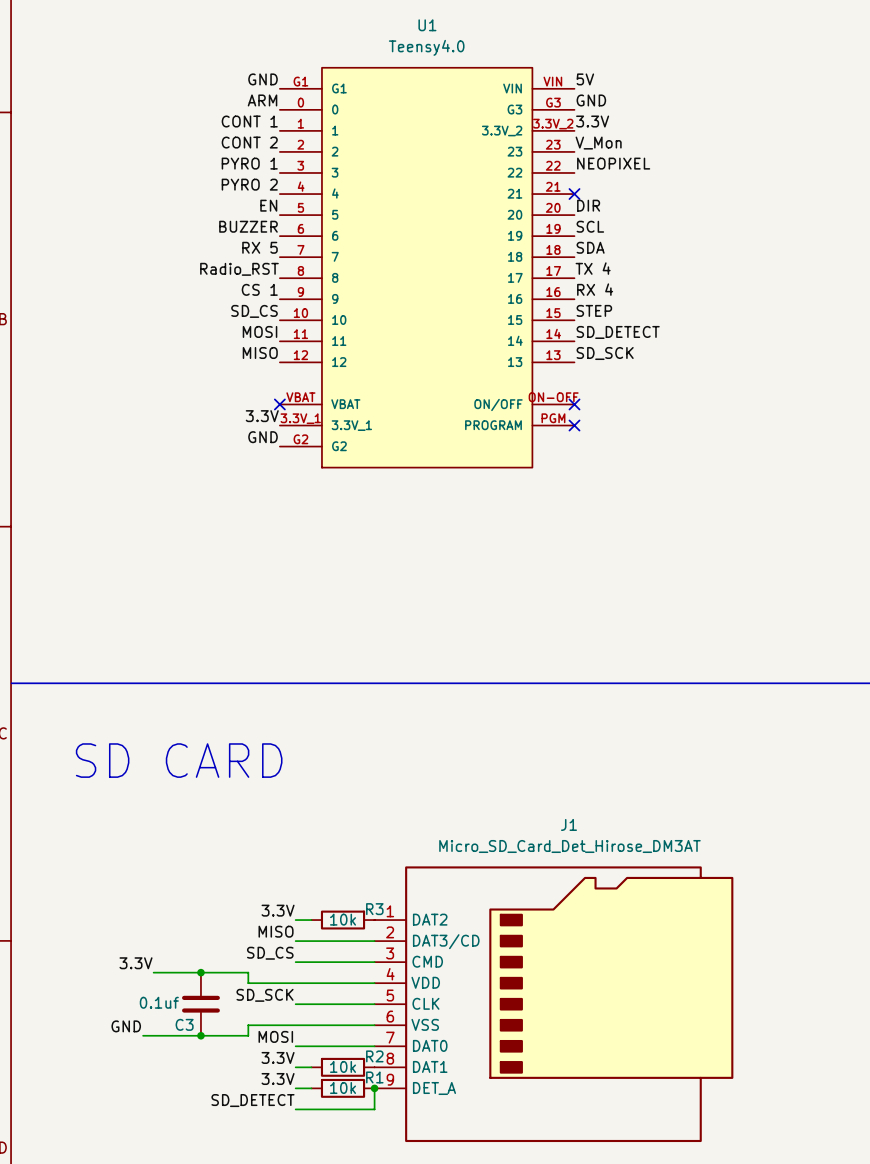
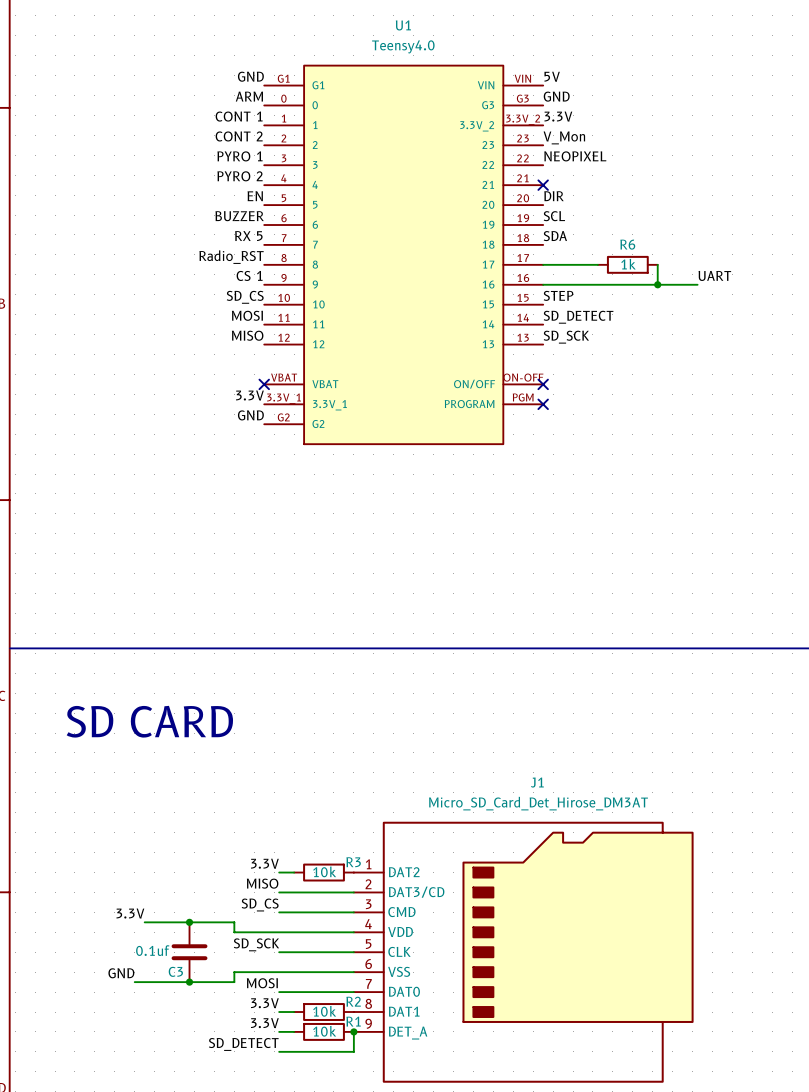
label: TX 4 (593, 268) -> none
wire: none -> (543, 264) (597, 264)
R6: none -> 1k (627, 264)
wire: none -> (657, 264) (657, 284)
label: RX 4 (595, 289) -> none
label: none -> UART (714, 275)
wire: none -> (543, 284) (697, 284)
junction: none -> (657, 284)

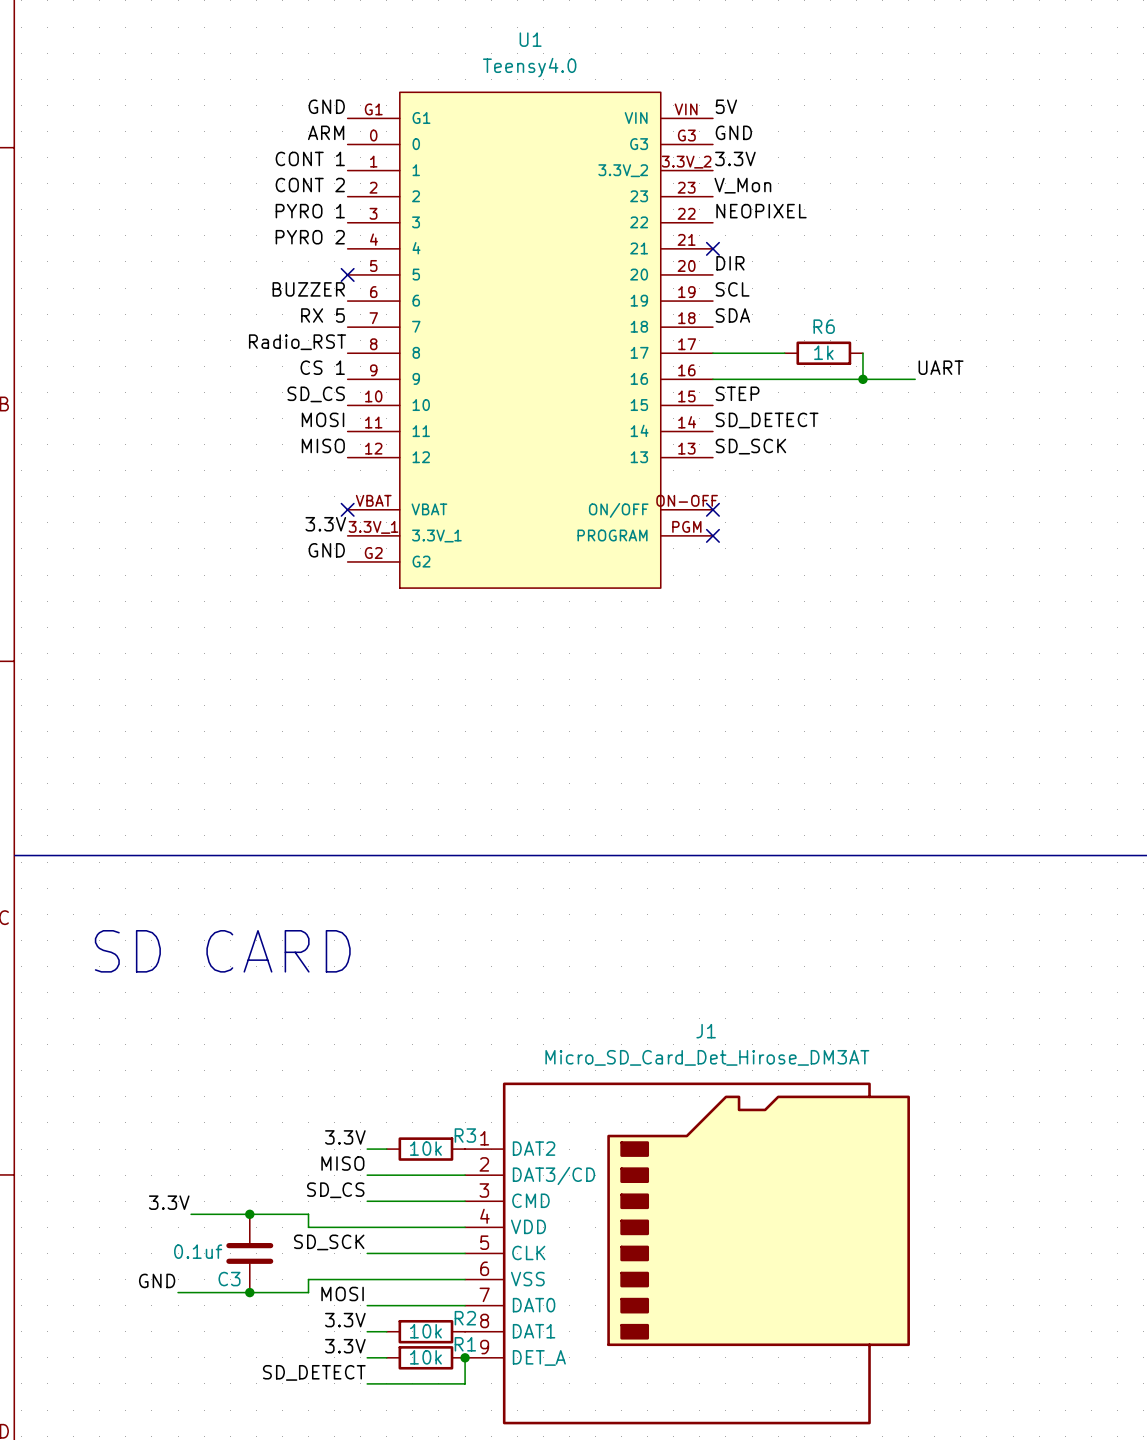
label: EN (255, 196) -> none
no-connect mark: none -> (347, 274)

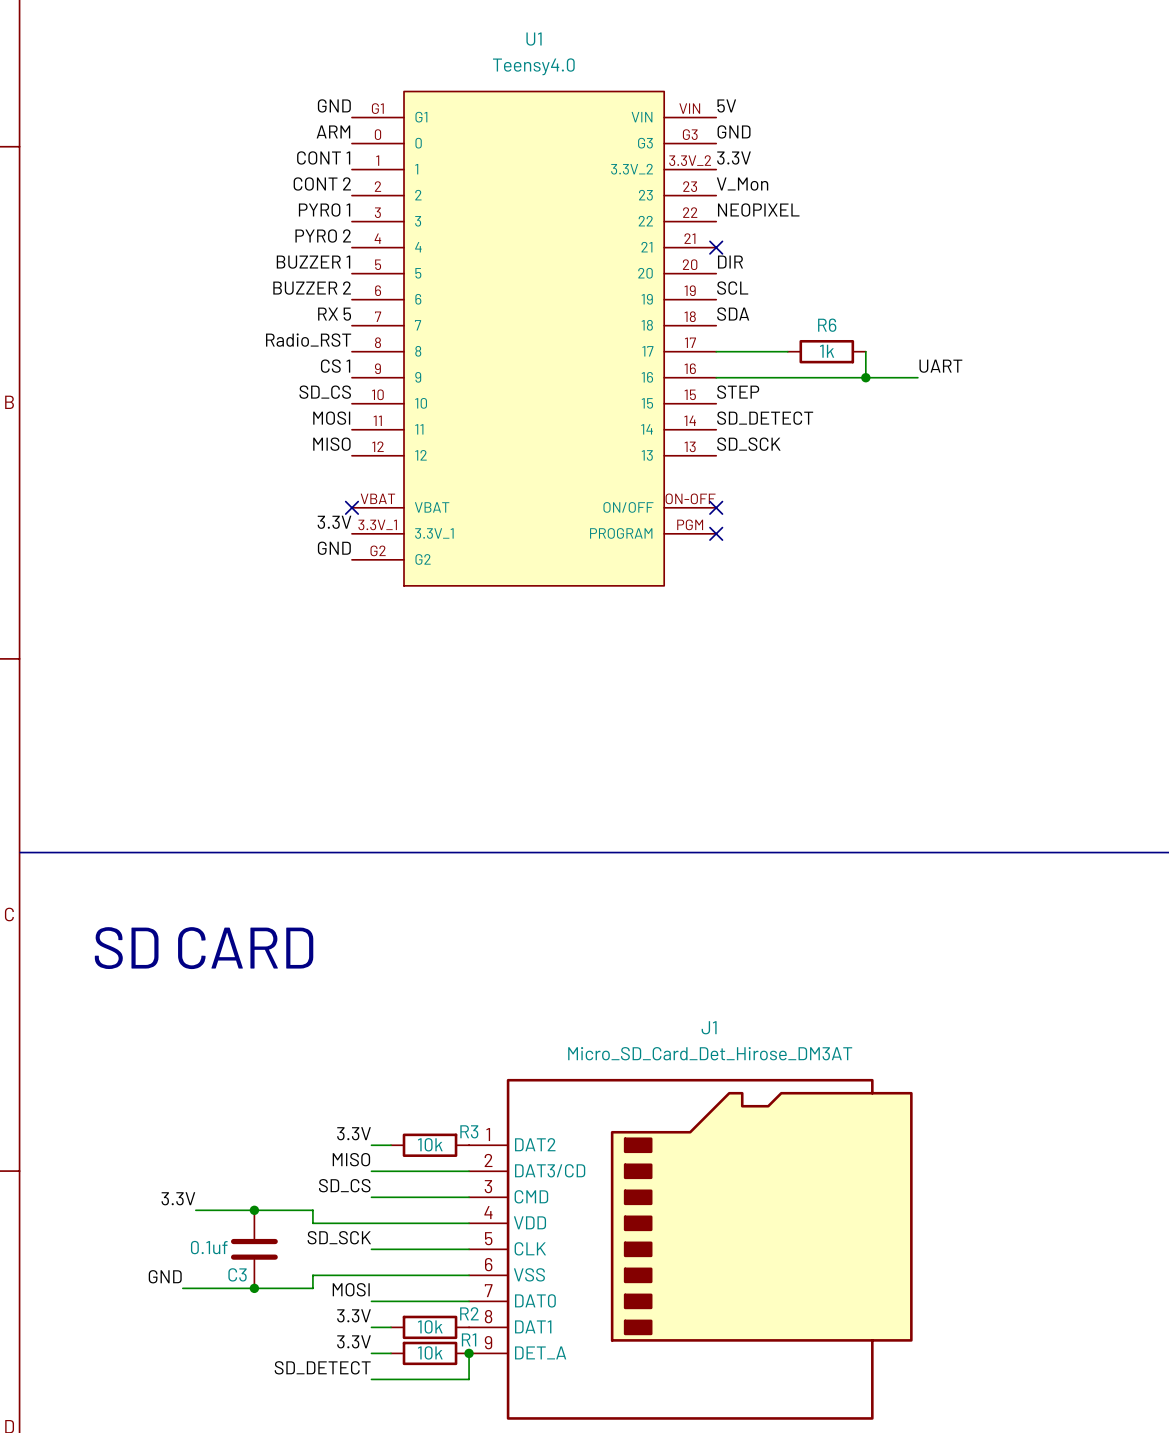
label: none -> BUZZER 1 (313, 262)
no-connect mark: (347, 274) -> none
label: BUZZER (308, 289) -> BUZZER 2 (312, 288)

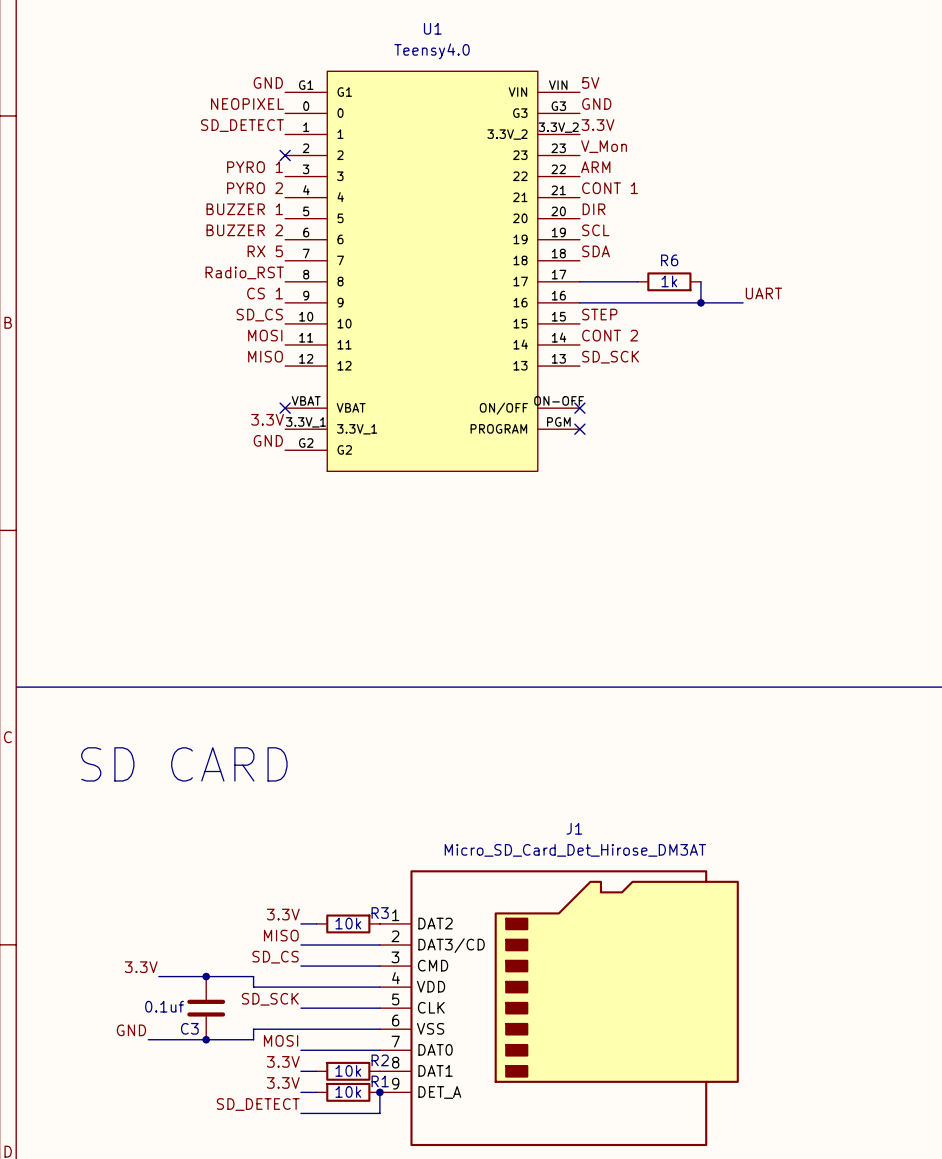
label: ARM (333, 131) -> NEOPIXEL (247, 104)
label: CONT 1 (323, 157) -> SD_DETECT (242, 125)
label: CONT 2 (322, 183) -> none
no-connect mark: none -> (285, 155)
label: NEOPIXEL (758, 210) -> ARM (595, 167)
label: none -> CONT 1 (610, 188)
no-connect mark: (716, 247) -> none
label: SD_DETECT (765, 418) -> CONT 2 (610, 335)

